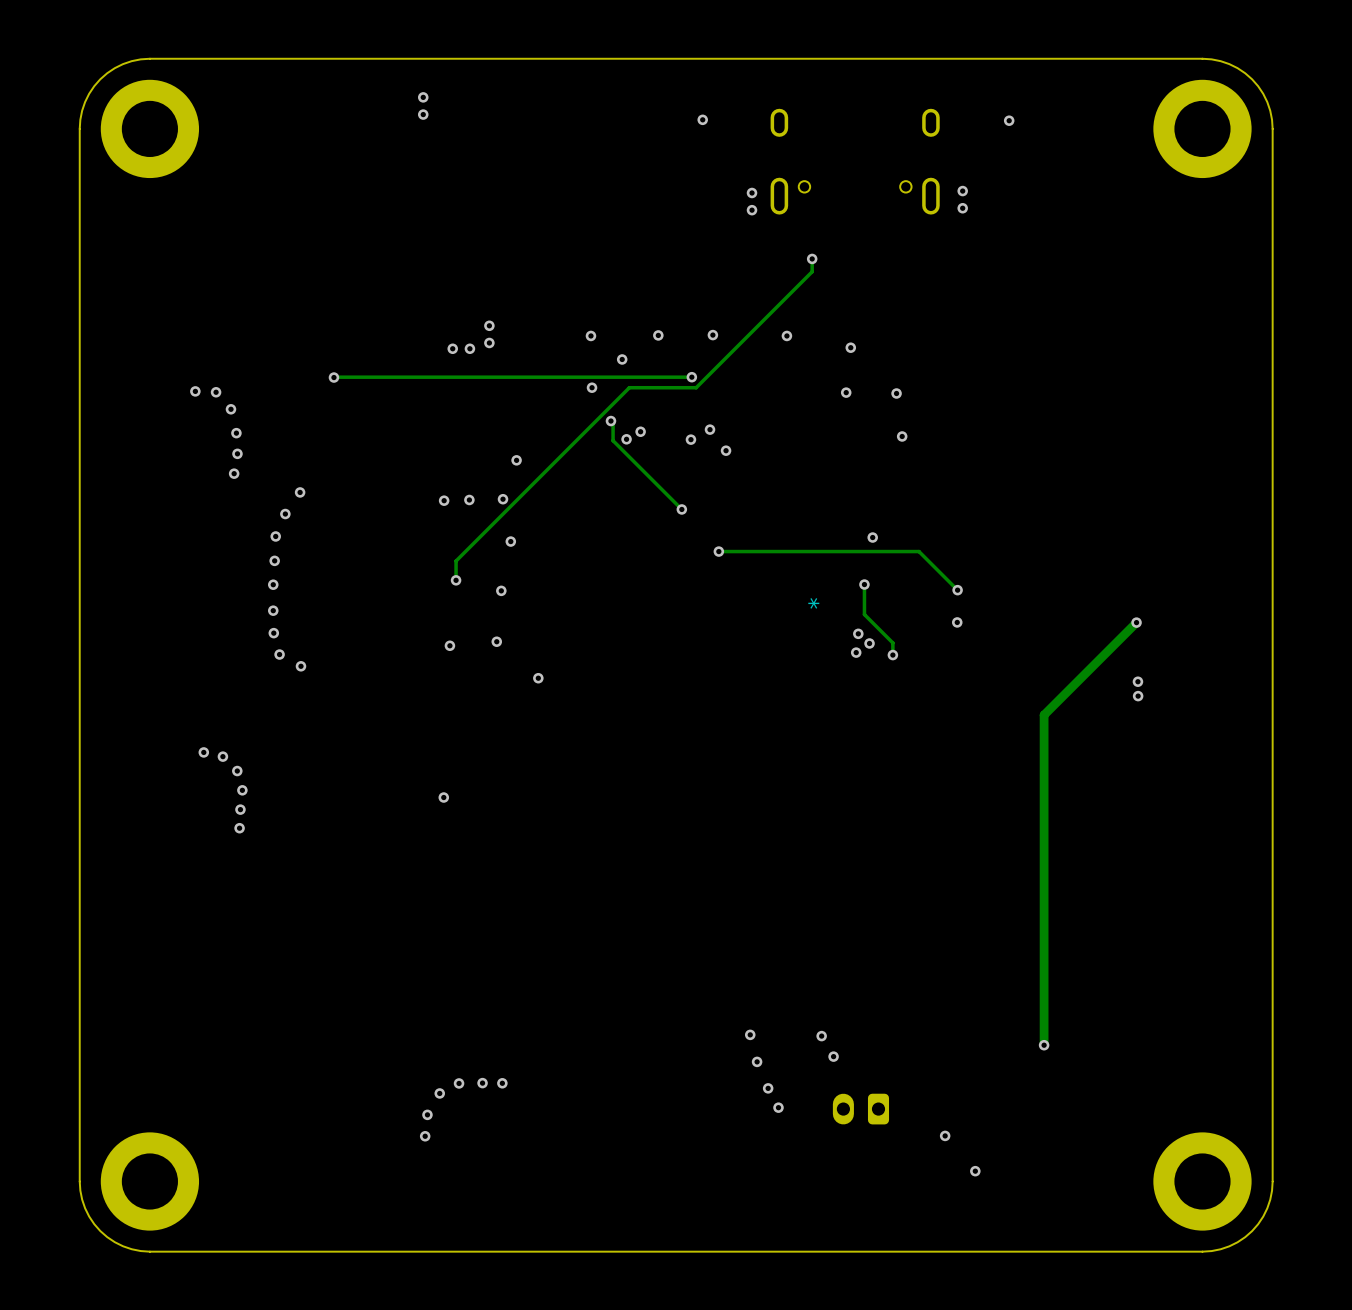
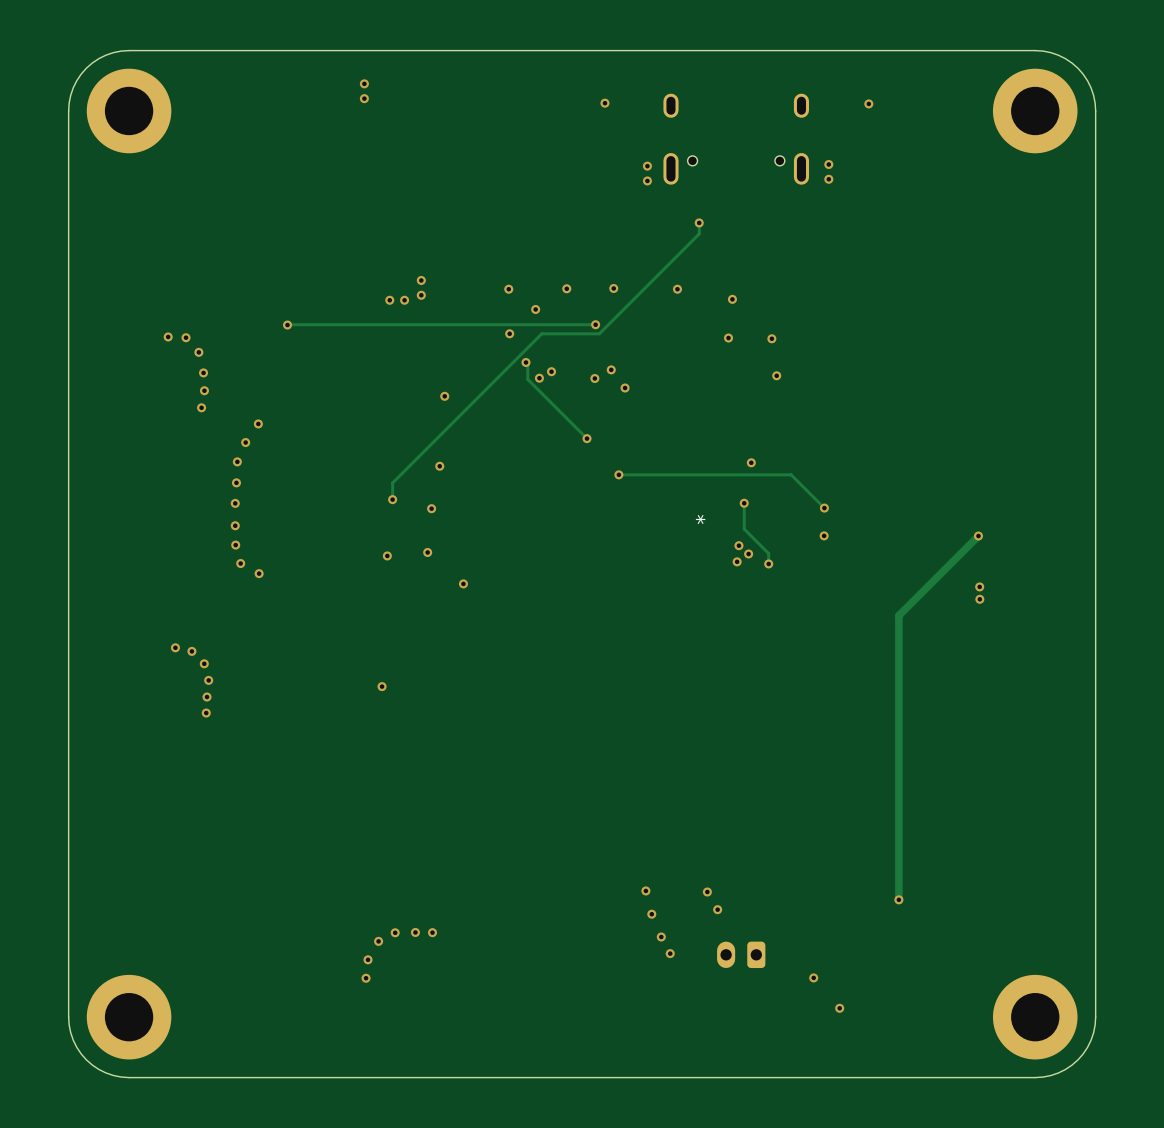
via: (469, 499) -> none
via: (503, 499) -> none
via: (444, 500) -> none

